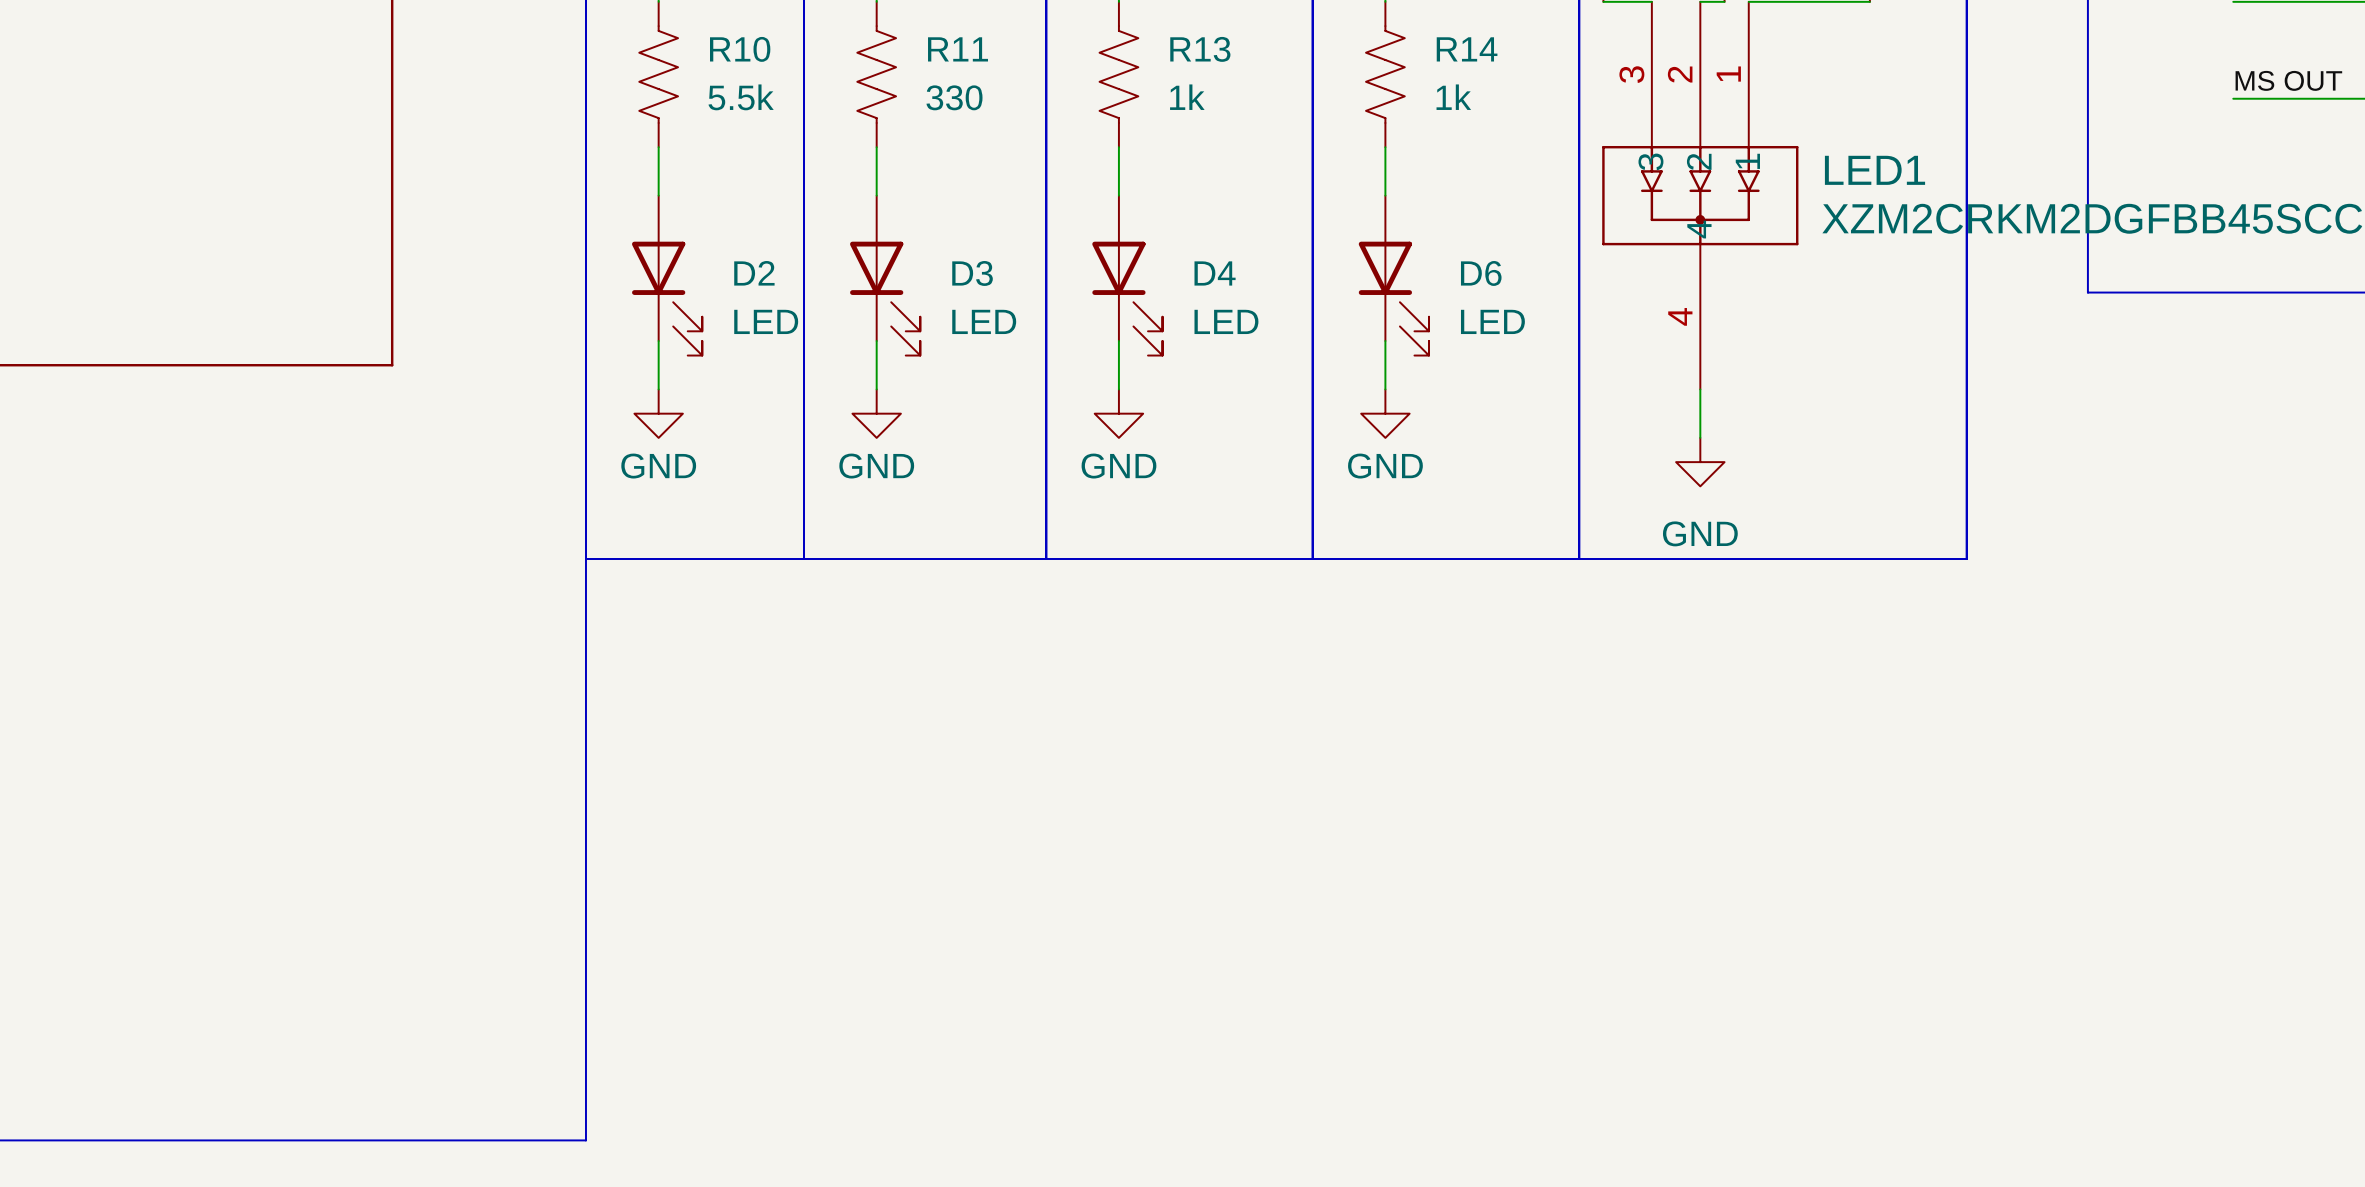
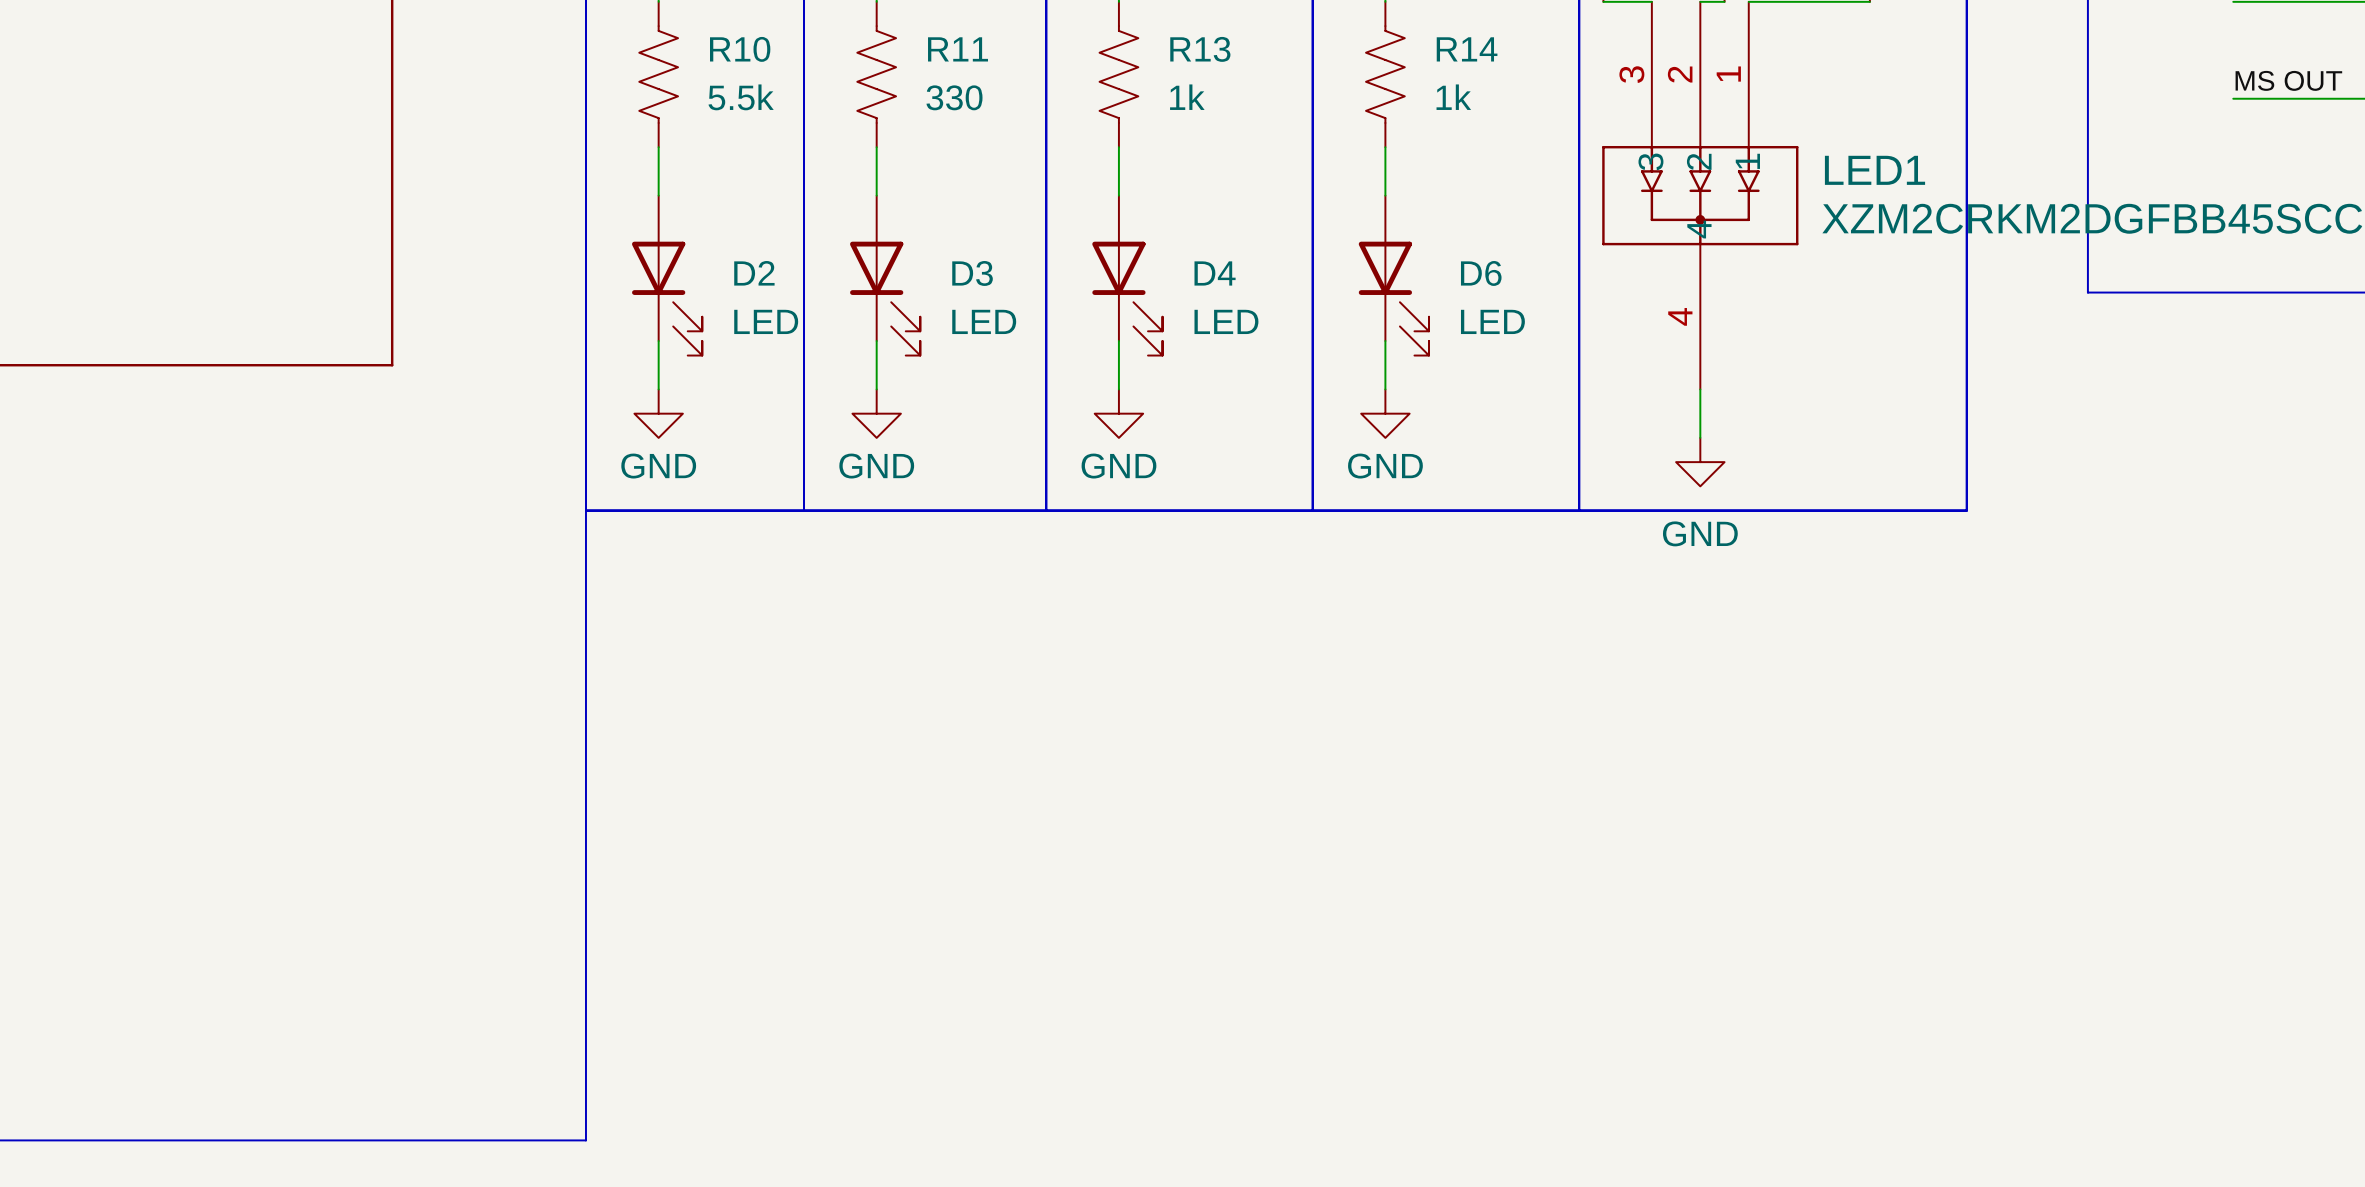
line: (804, 510) (804, 559) -> none
line: (1046, 510) (1046, 559) -> none
line: (1312, 510) (1312, 559) -> none
line: (1579, 510) (1579, 559) -> none
line: (1966, 510) (1966, 559) (585, 559) -> (1966, 510) (585, 510)

